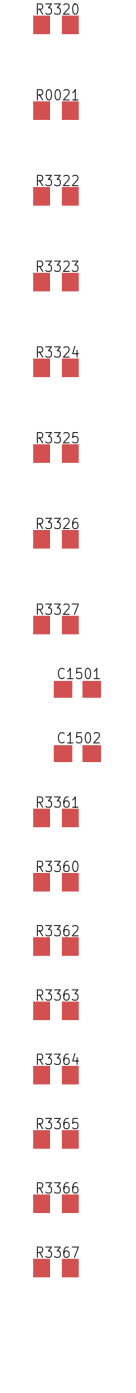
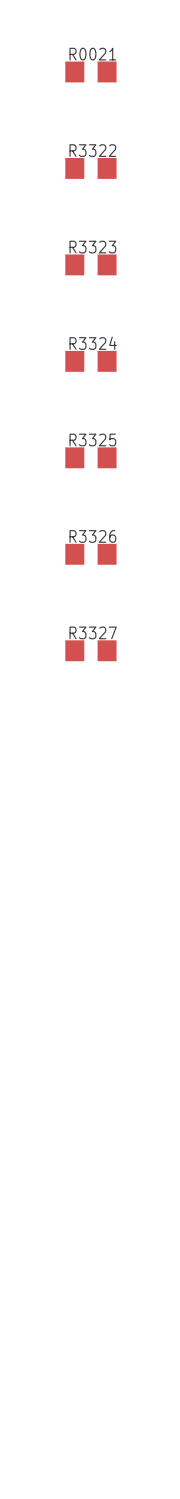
C1501: (77, 689) -> none
C1502: (77, 753) -> none
R3361: (55, 817) -> none
R3360: (55, 882) -> none
R3362: (55, 946) -> none
R3363: (55, 1010) -> none
R3364: (55, 1075) -> none
R3365: (55, 1139) -> none
R3366: (55, 1203) -> none
R3367: (55, 1268) -> none

